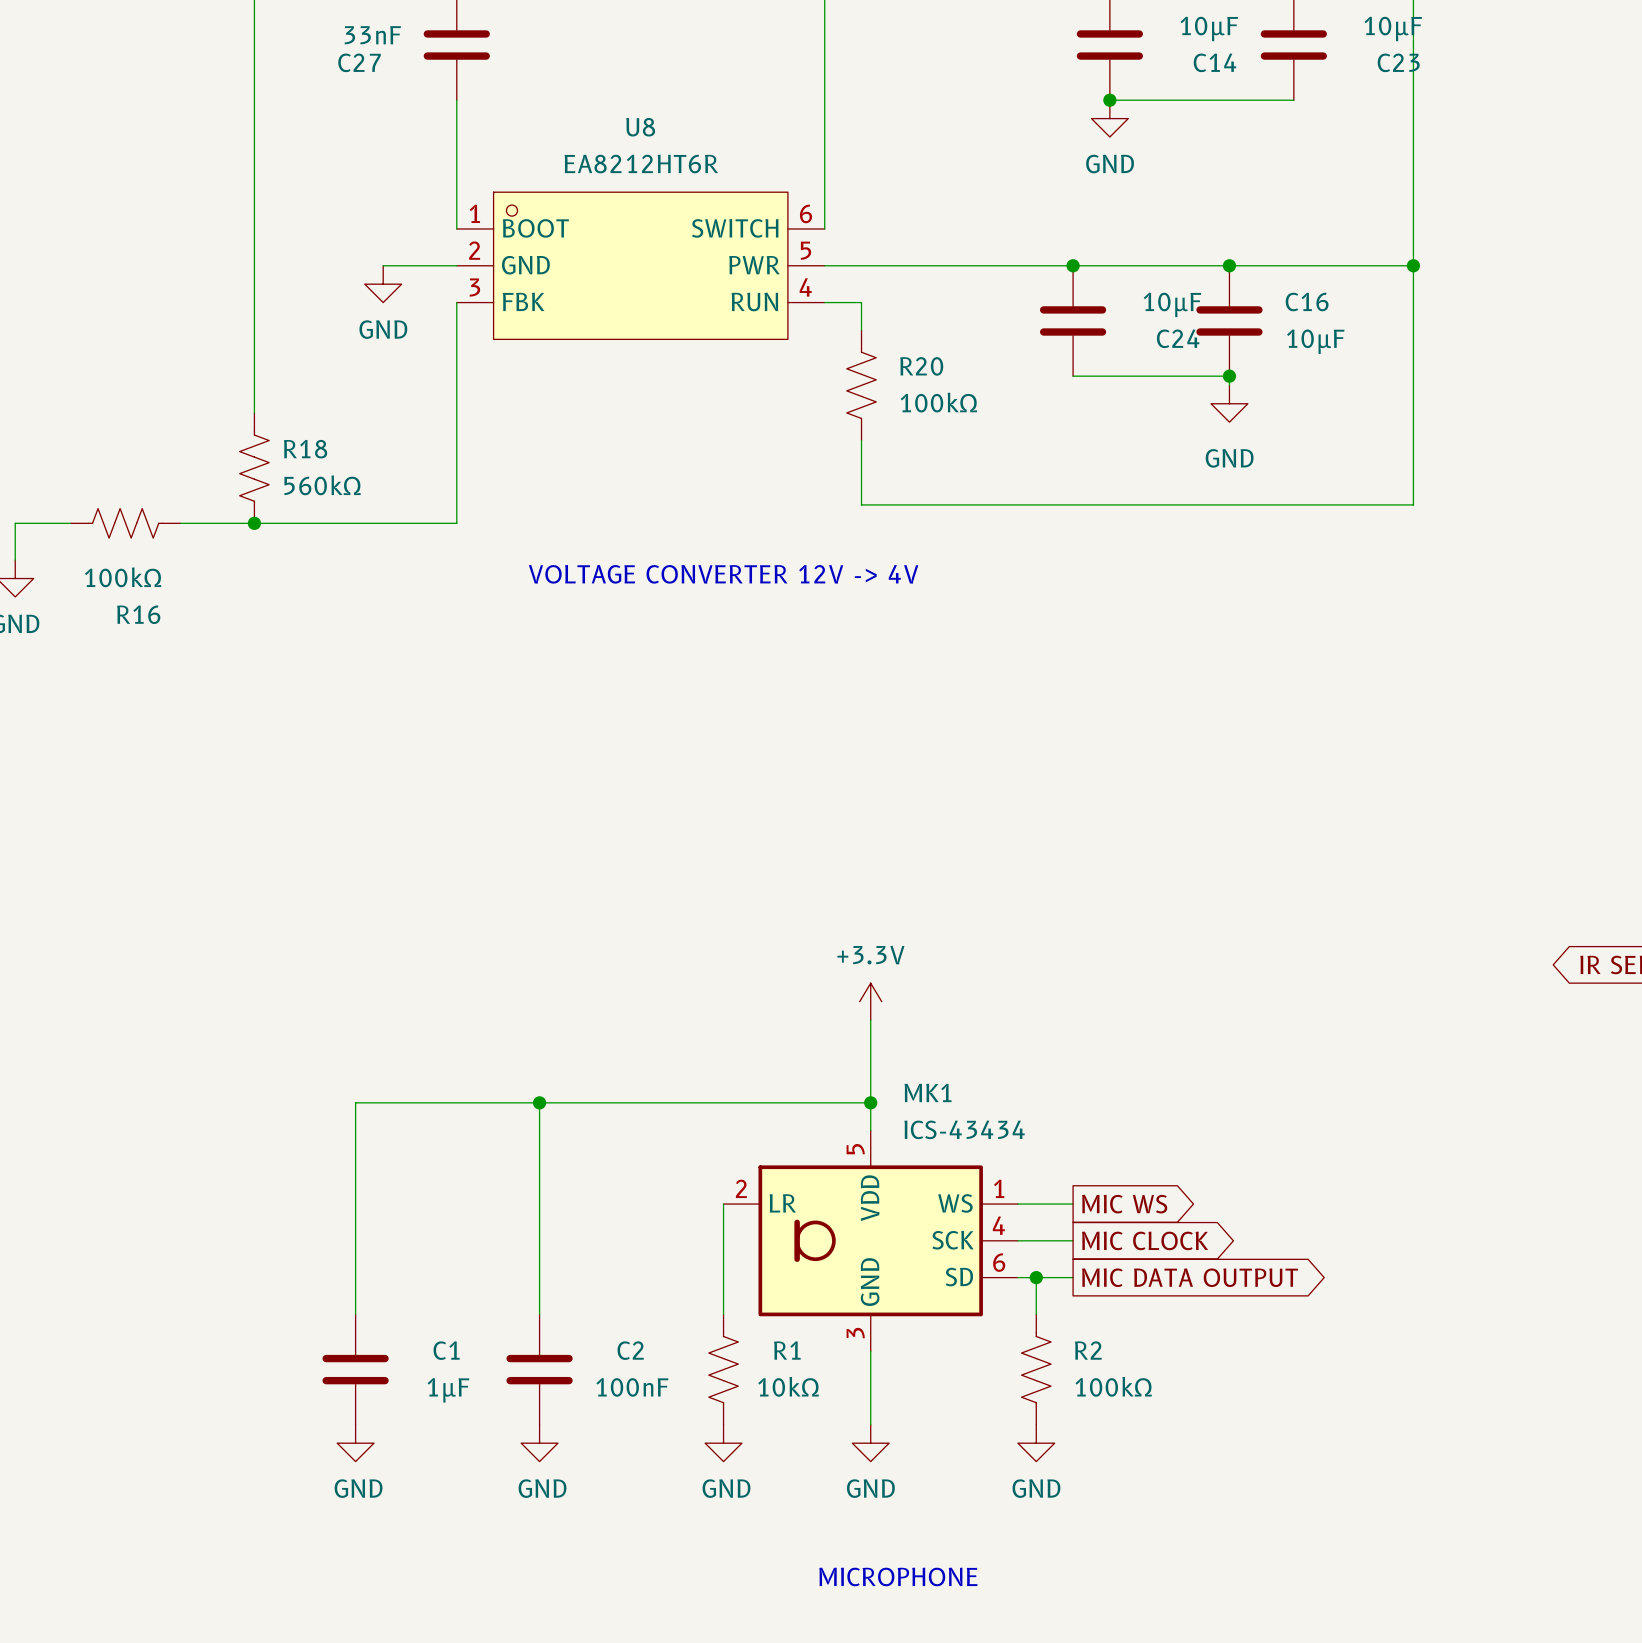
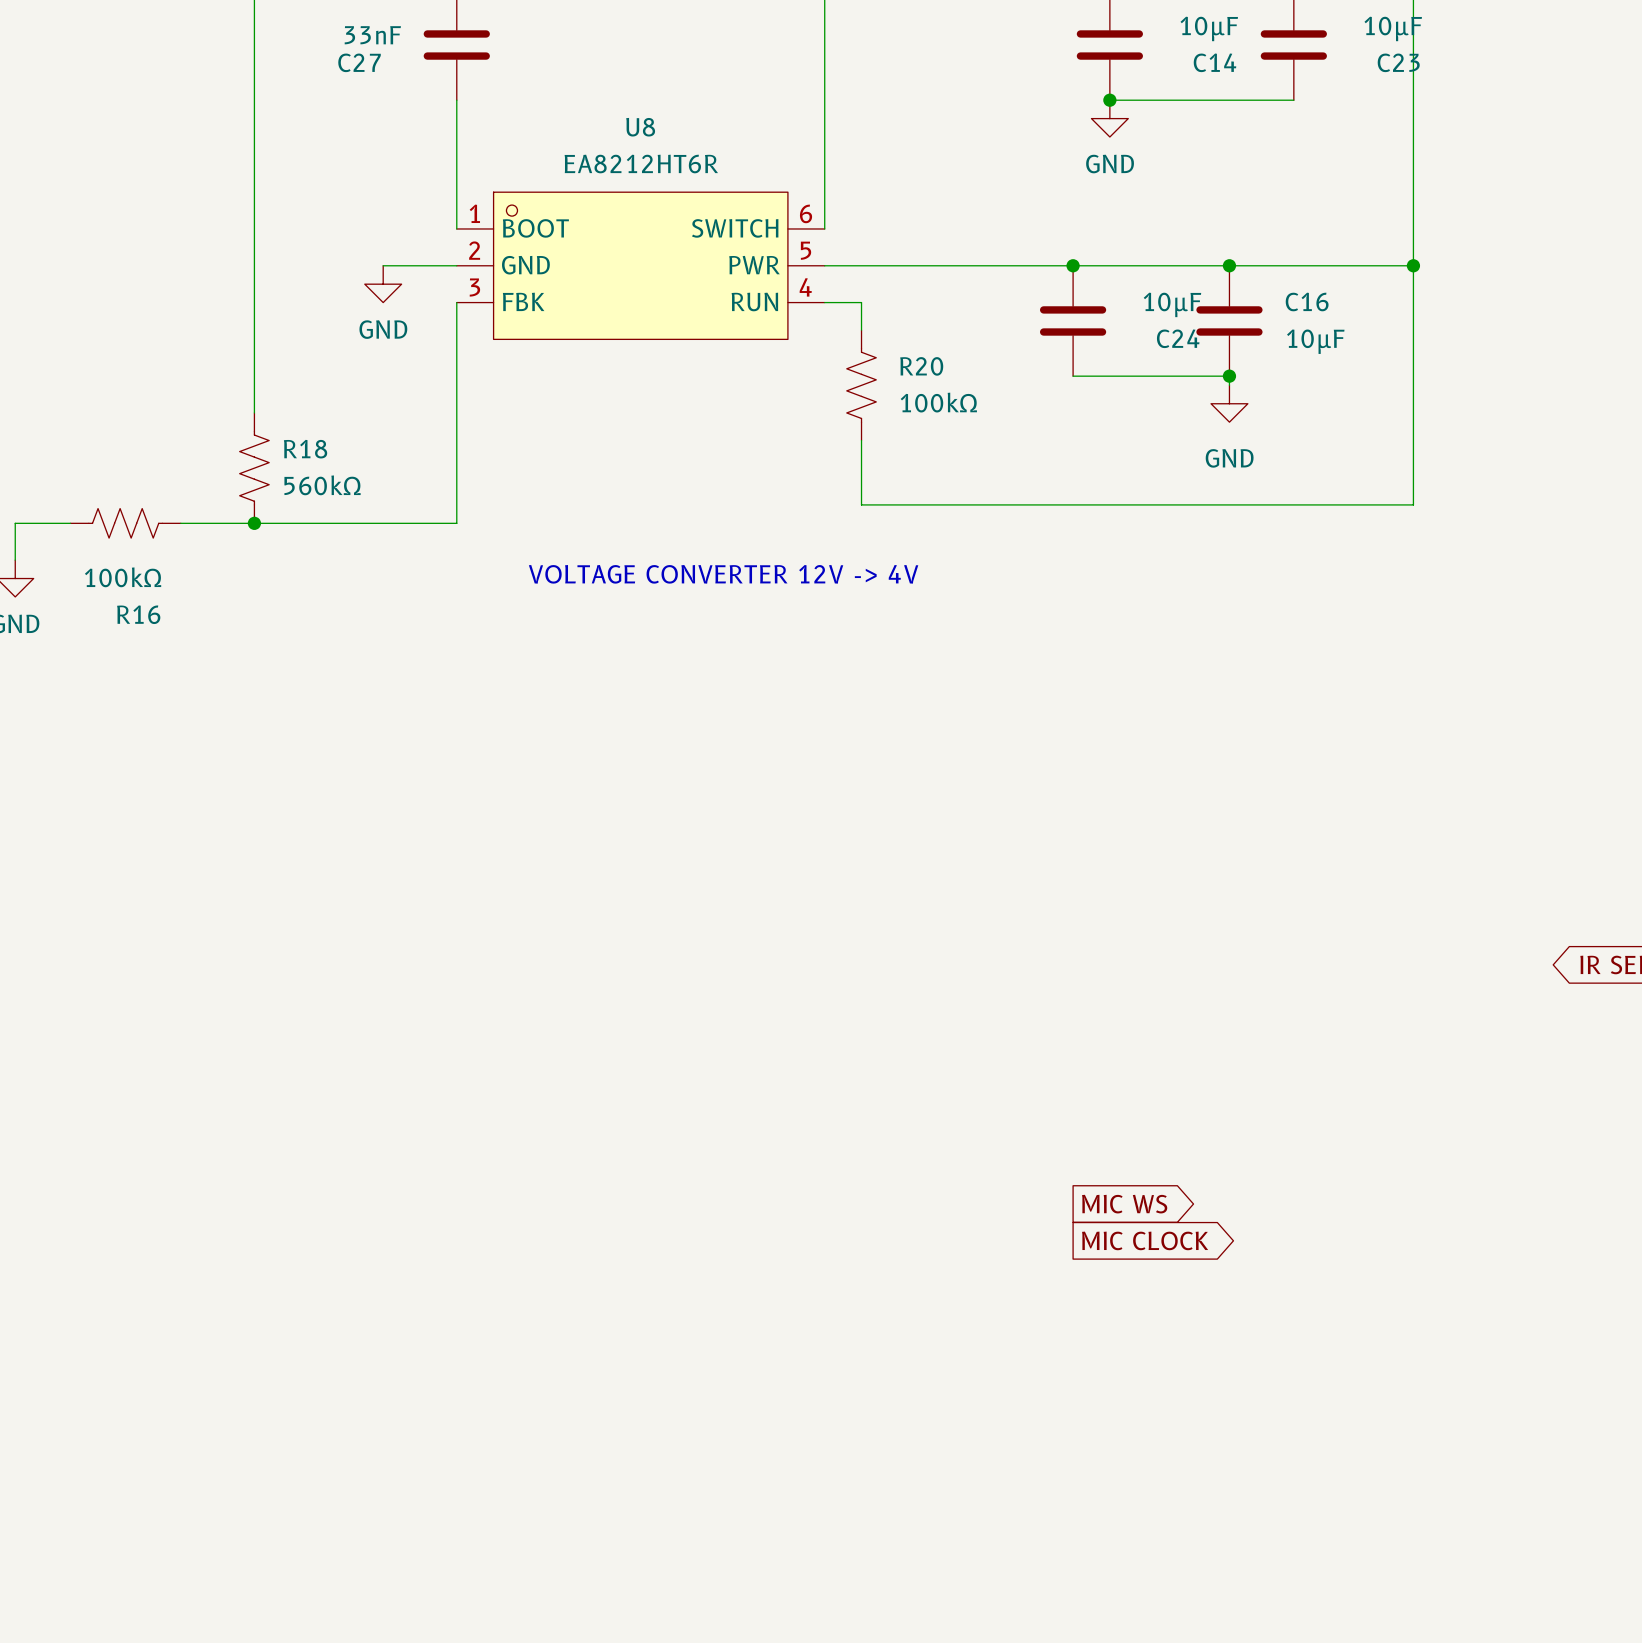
power symbol: +3.3V (870, 1001) -> none
wire: (870, 1020) (870, 1130) -> none
wire: (539, 1102) (539, 1314) -> none
junction: (539, 1102) -> none
wire: (870, 1102) (355, 1102) (355, 1314) -> none
junction: (870, 1102) -> none
wire: (723, 1204) (723, 1314) -> none
wire: (1017, 1204) (1073, 1204) -> none
MK1: ICS-43434 (870, 1240) -> none
wire: (1017, 1240) (1073, 1240) -> none
wire: (1017, 1277) (1073, 1277) -> none
wire: (1036, 1277) (1036, 1314) -> none
junction: (1036, 1277) -> none
global label: MIC DATA OUTPUT (1190, 1277) -> none
wire: (870, 1351) (870, 1424) -> none
C1: 1µF (355, 1369) -> none
C2: 100nF (539, 1369) -> none
R1: 10kΩ (723, 1369) -> none
R2: 100kΩ (1036, 1369) -> none
power symbol: GND (355, 1443) -> none
power symbol: GND (539, 1443) -> none
power symbol: GND (723, 1443) -> none
power symbol: GND (870, 1443) -> none
power symbol: GND (1036, 1443) -> none
text: MICROPHONE (898, 1576) -> none

